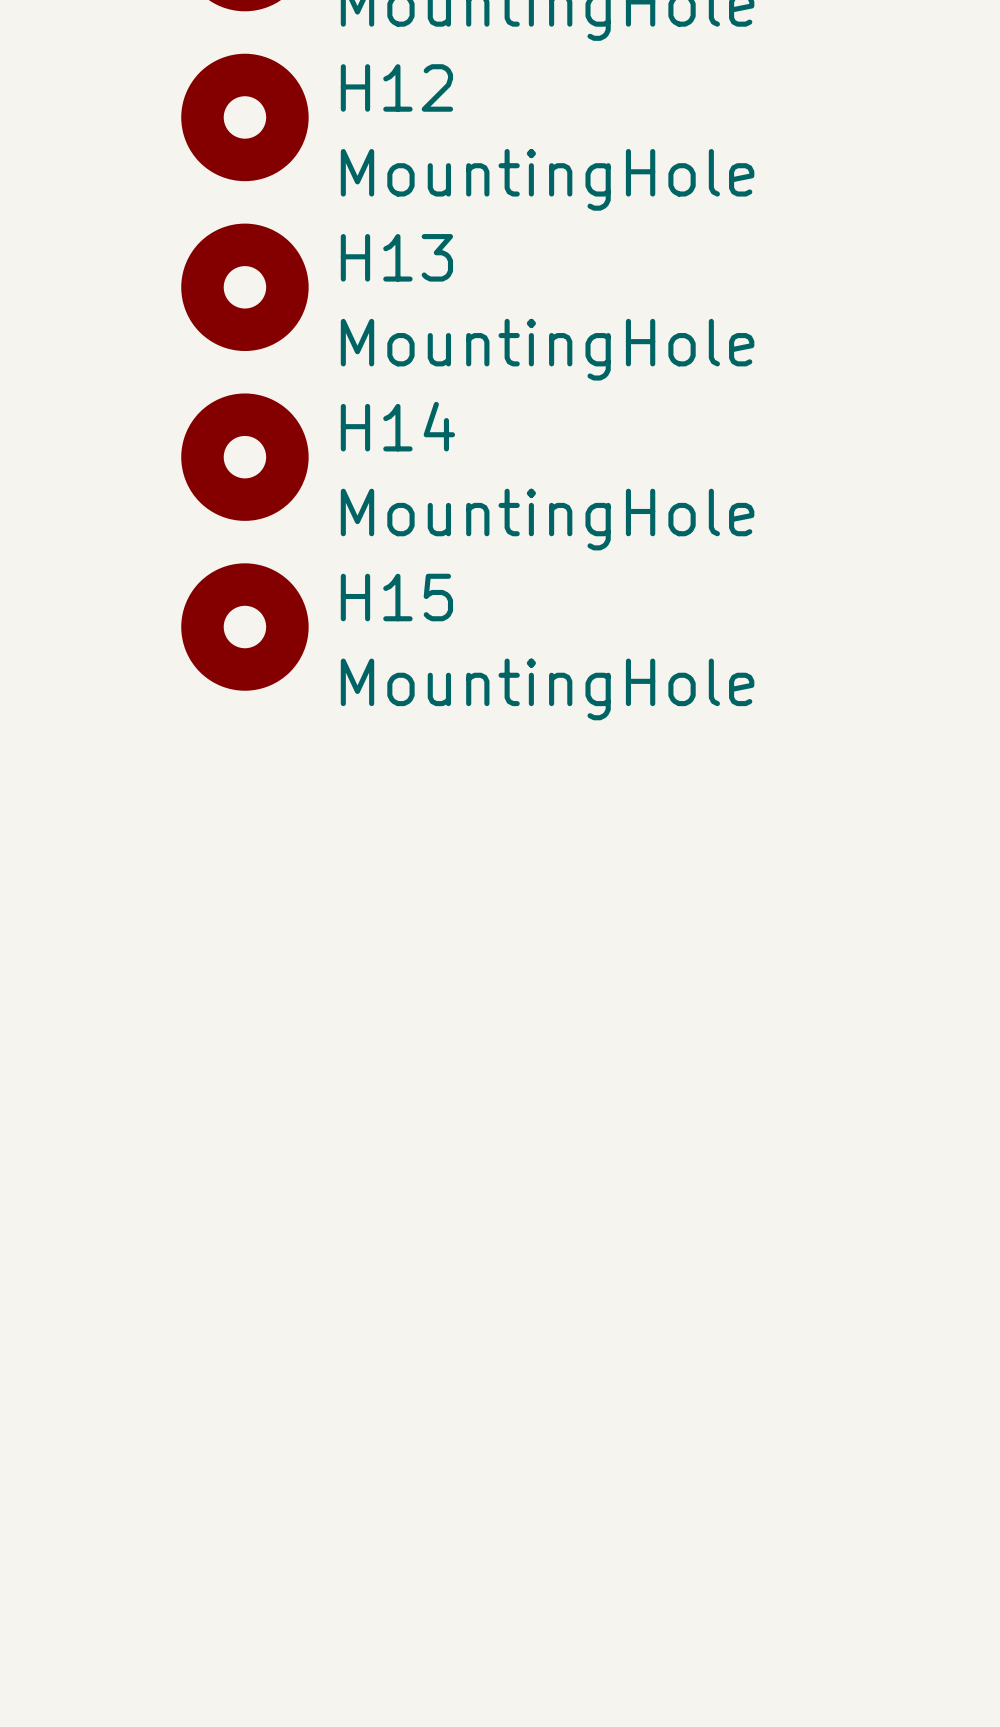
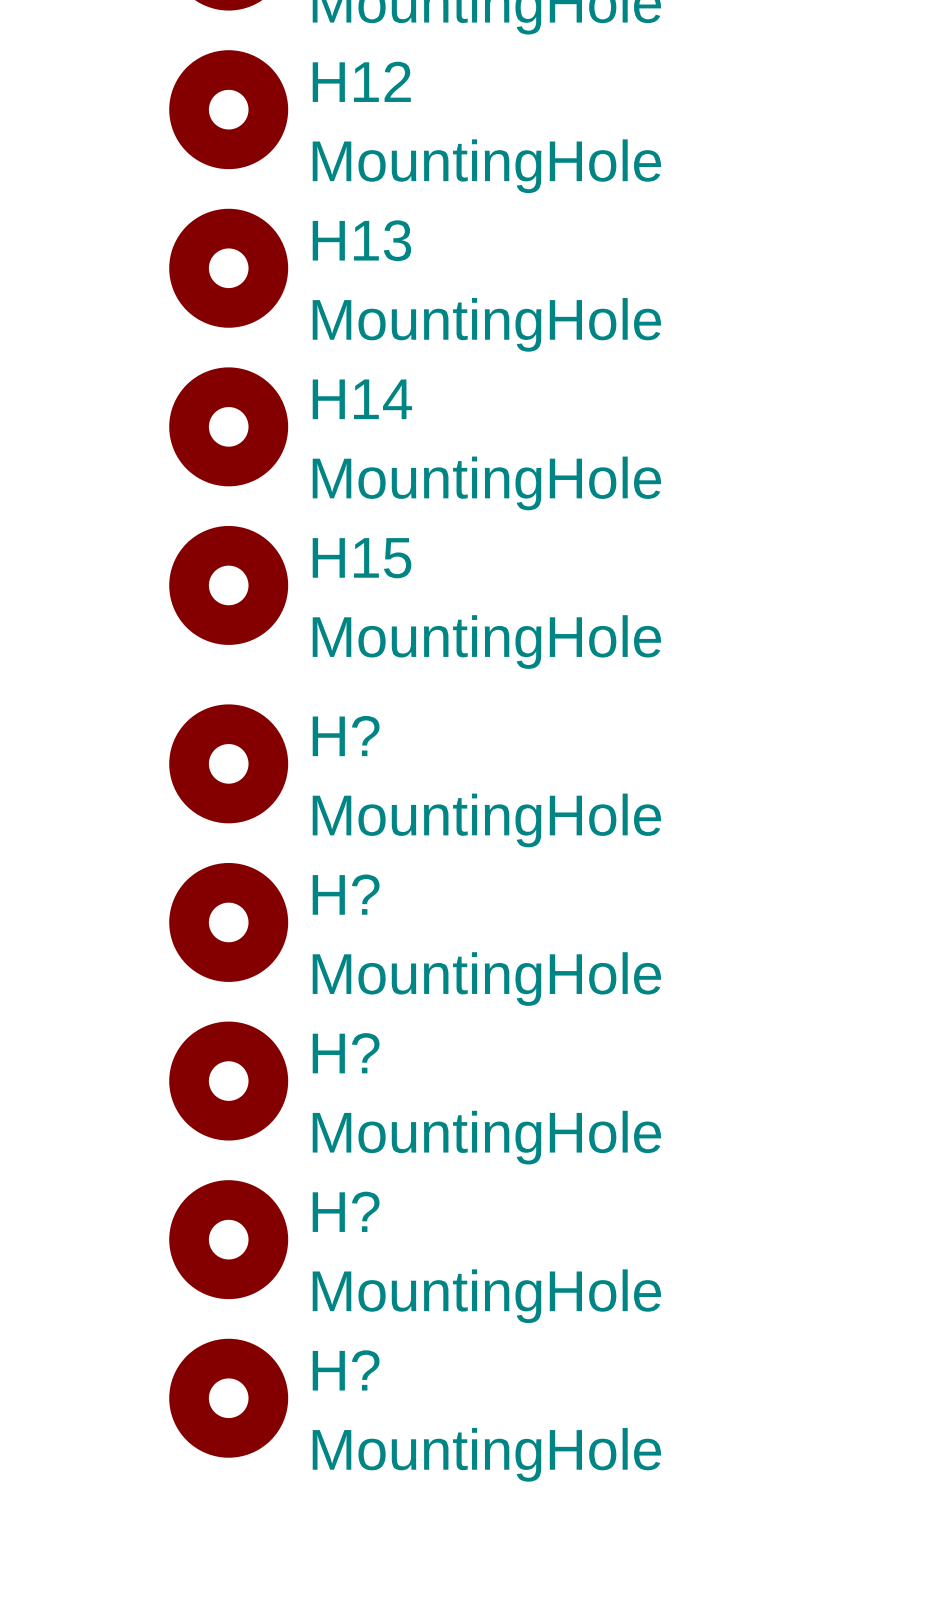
H?: none -> MountingHole (228, 763)
H?: none -> MountingHole (228, 922)
H?: none -> MountingHole (228, 1081)
H?: none -> MountingHole (228, 1239)
H?: none -> MountingHole (228, 1398)

